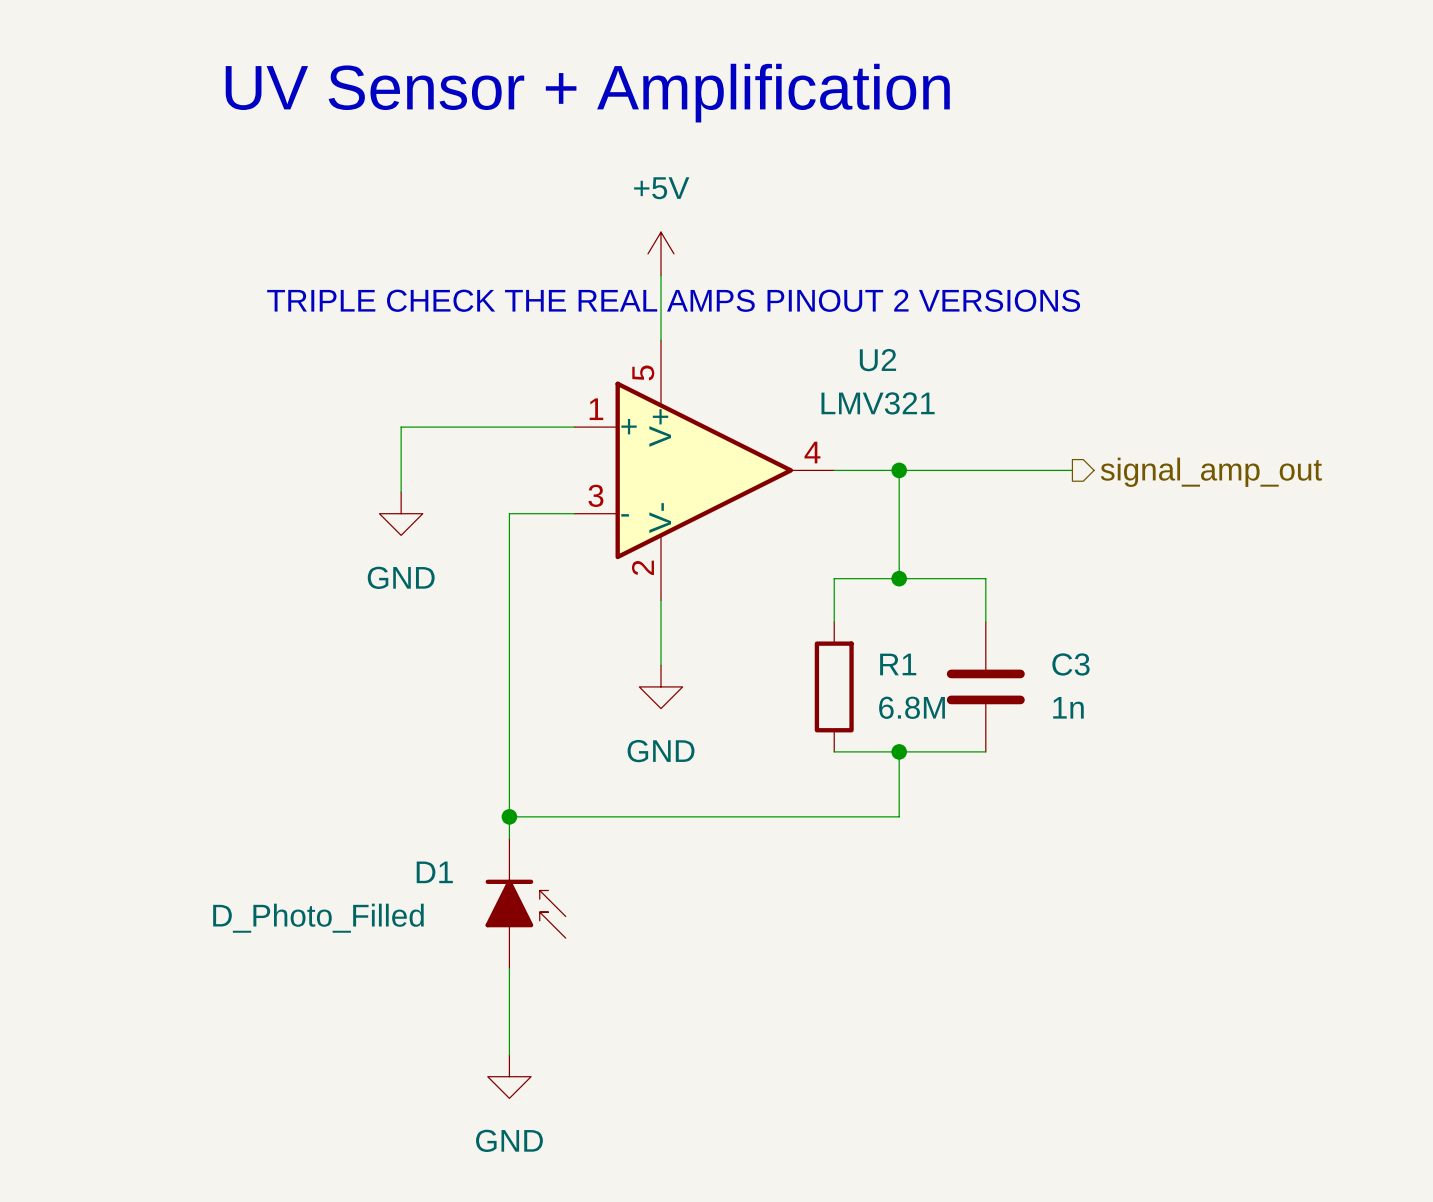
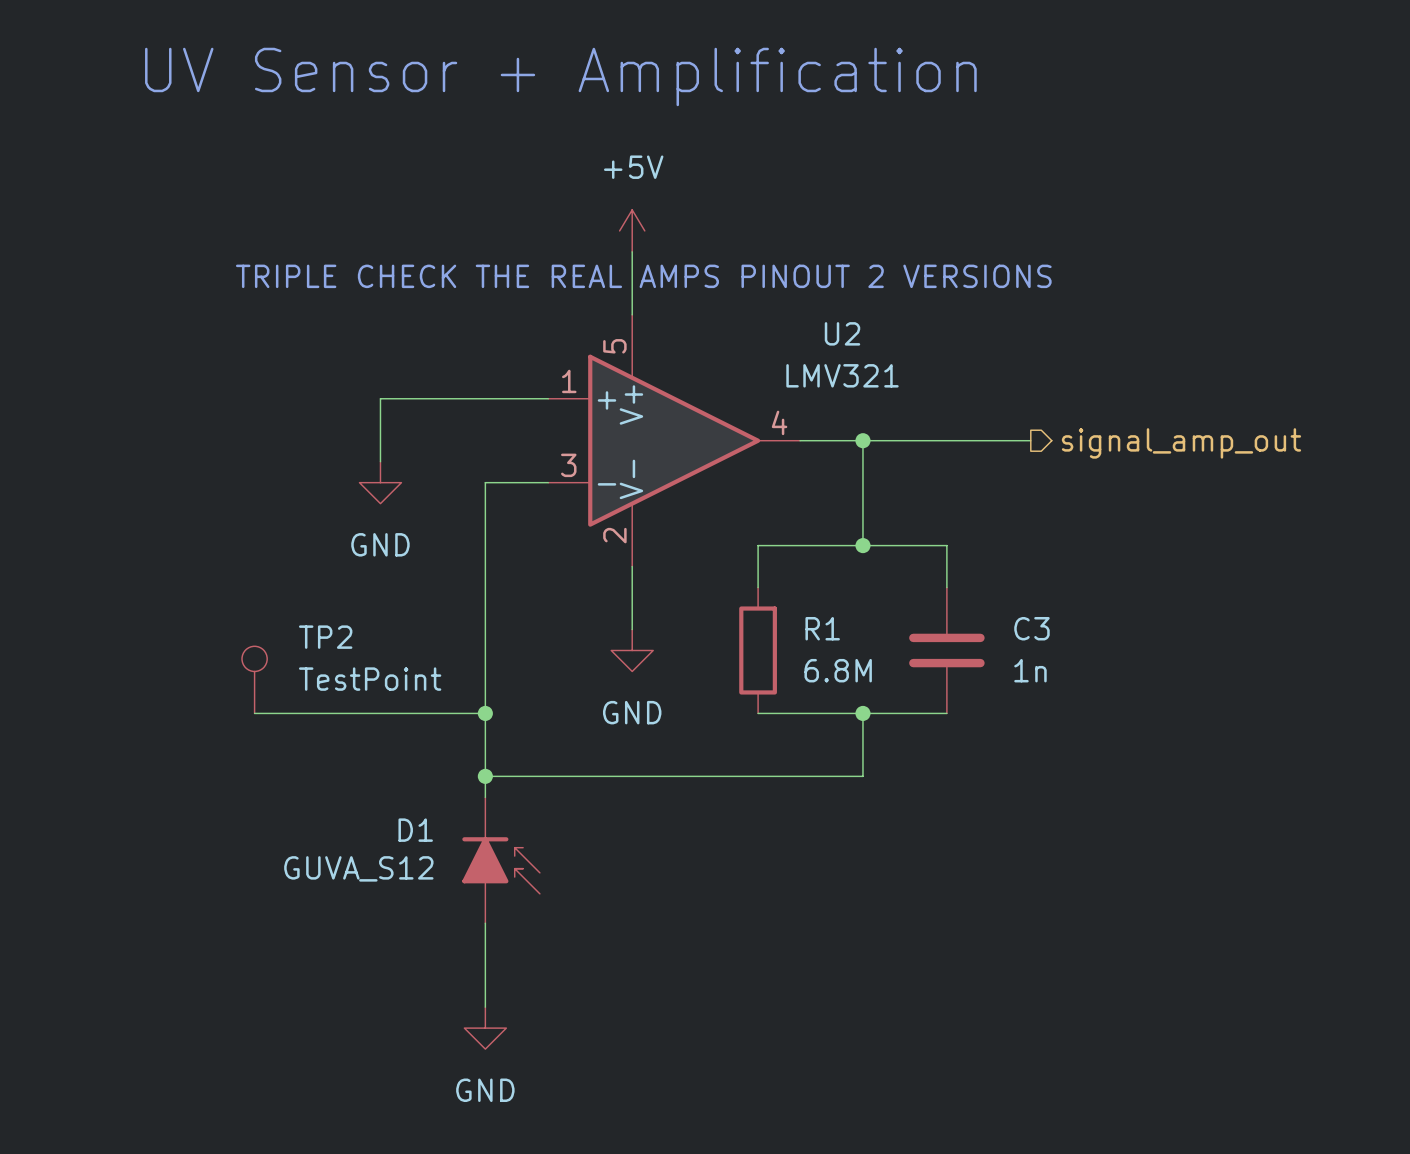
wire: (834, 578) (834, 621) -> (800, 545) (758, 545) (758, 587)
R1 position: (834, 686) -> (758, 650)
TP2: none -> TestPoint (254, 679)
wire: none -> (254, 713) (485, 713)
junction: none -> (485, 713)
wire: none -> (758, 713) (800, 713)
D1 value: D_Photo_Filled (318, 918) -> GUVA_S12 (358, 868)

